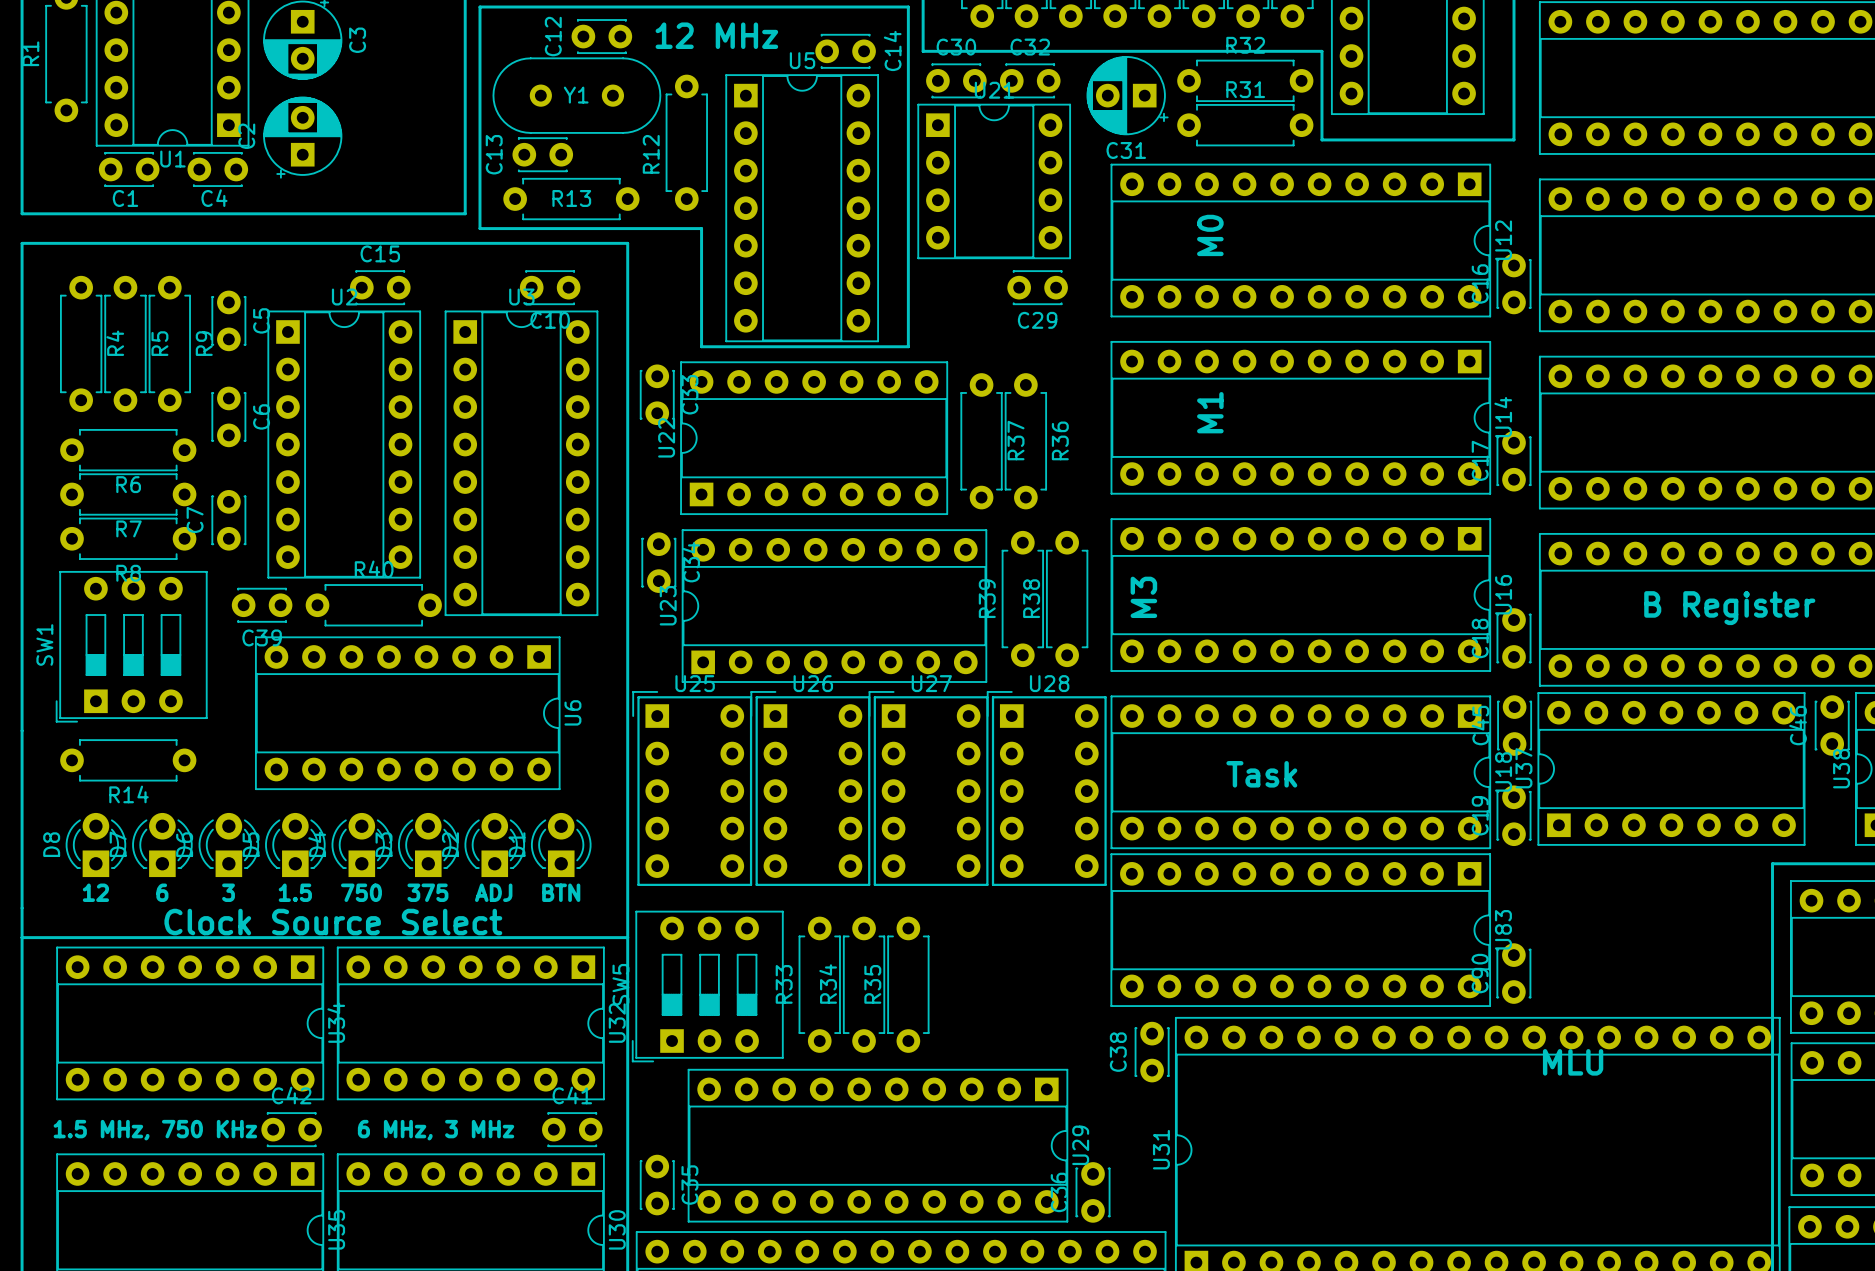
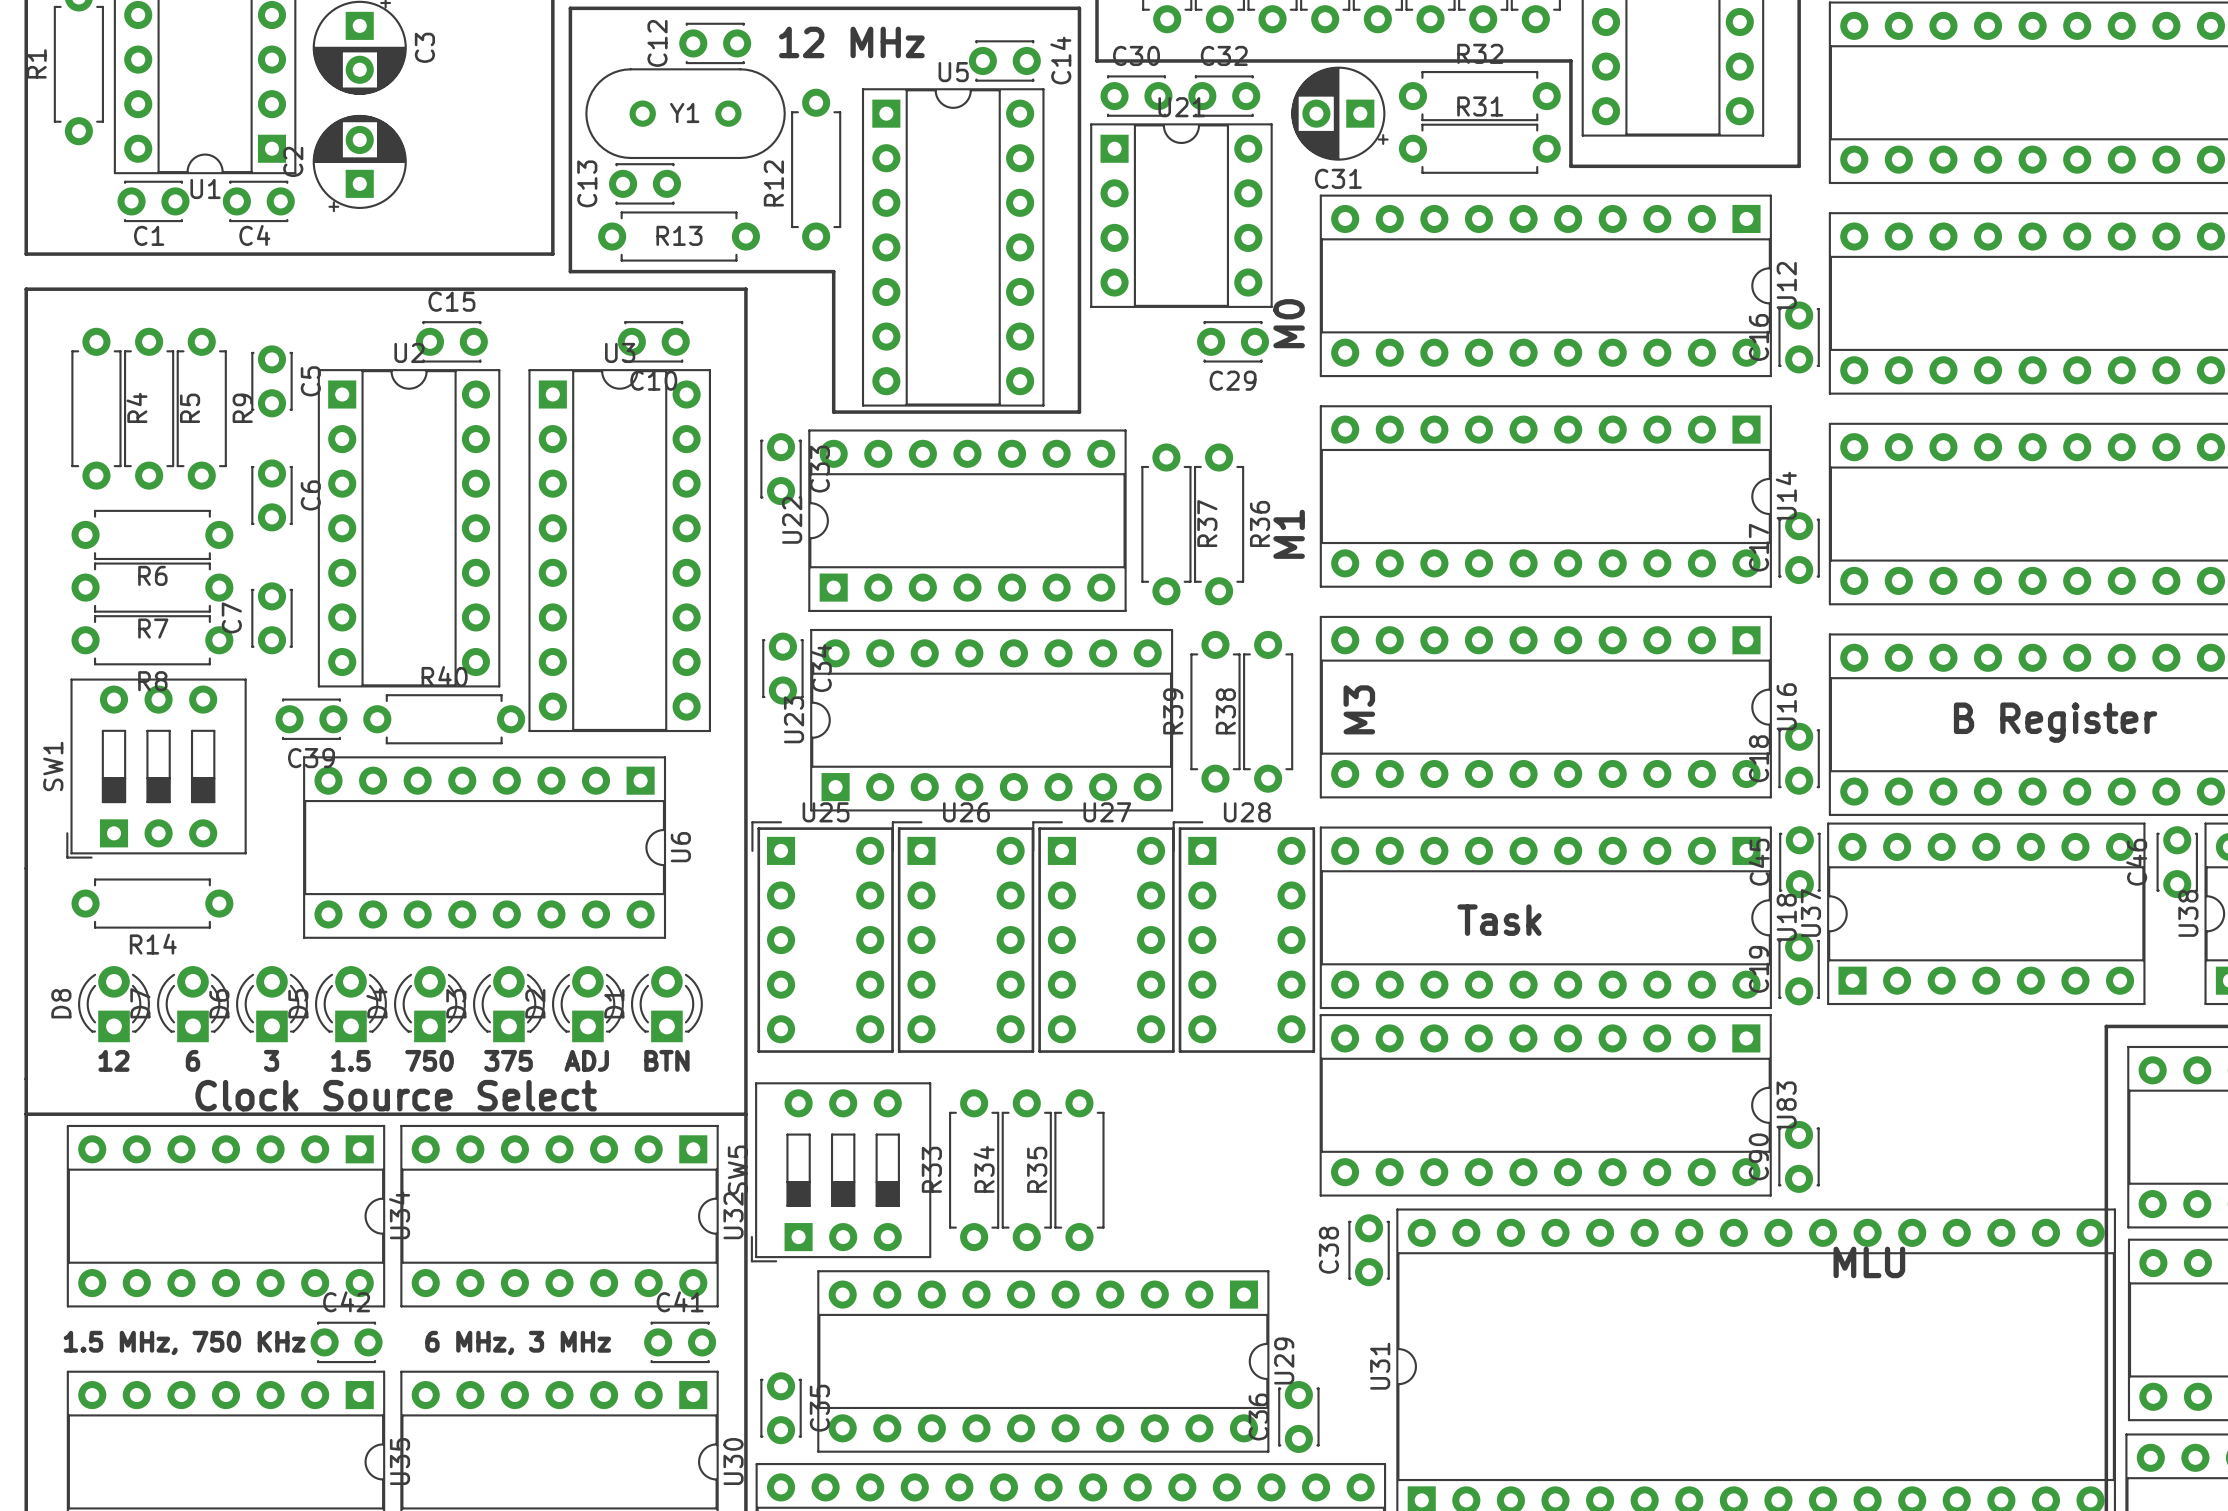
text position: M0 (1210, 235) -> M0 (1289, 323)
text position: M1 (1210, 412) -> M1 (1289, 534)

